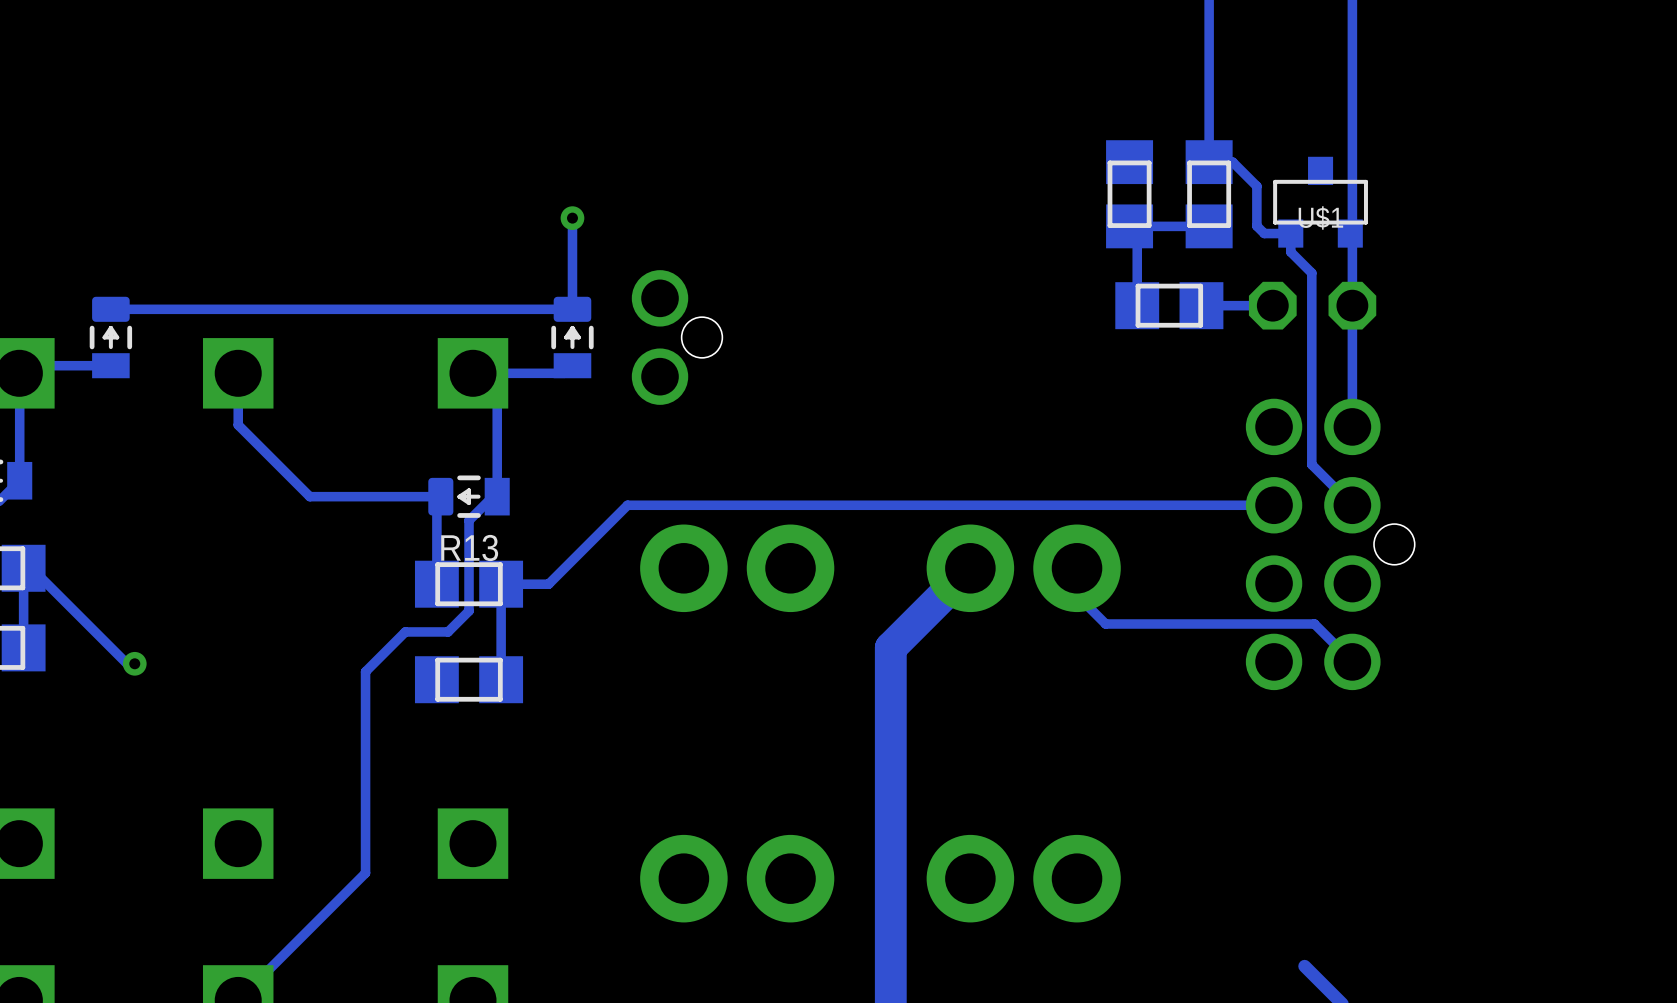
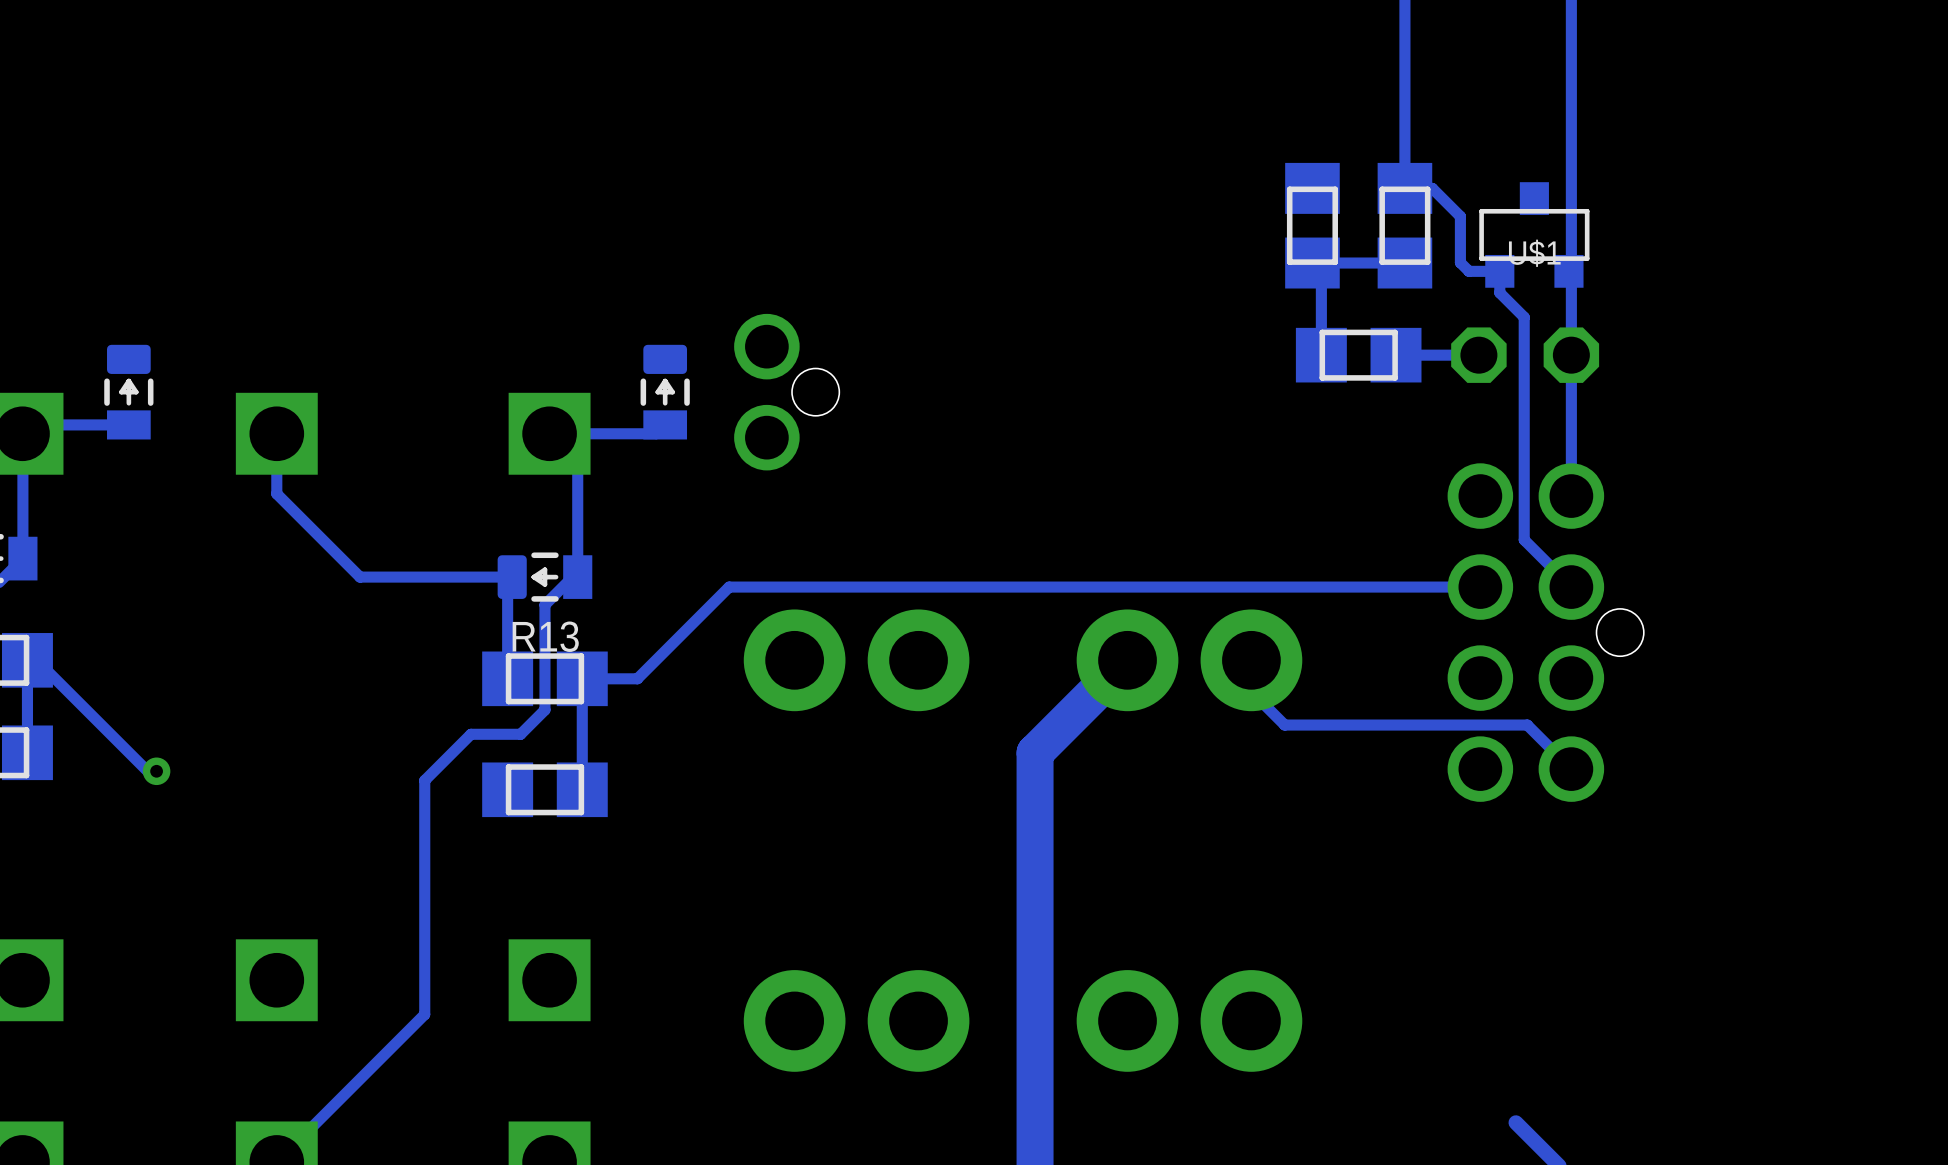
track: (572, 218) (572, 309) (110, 309) -> none
via: (572, 218) -> none

